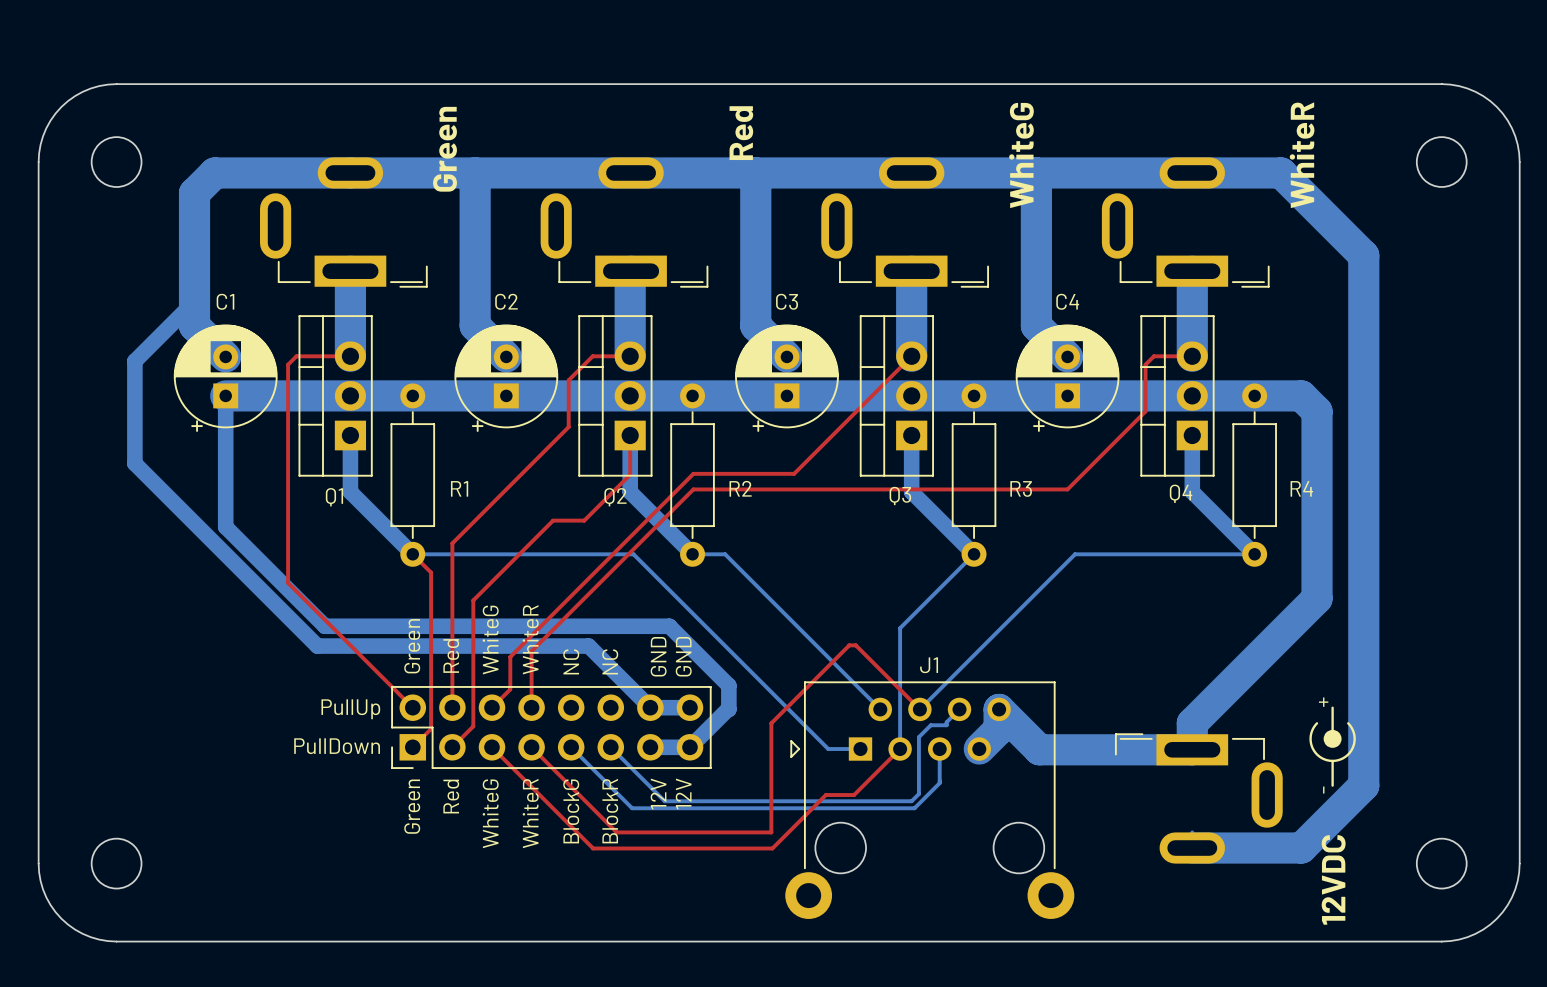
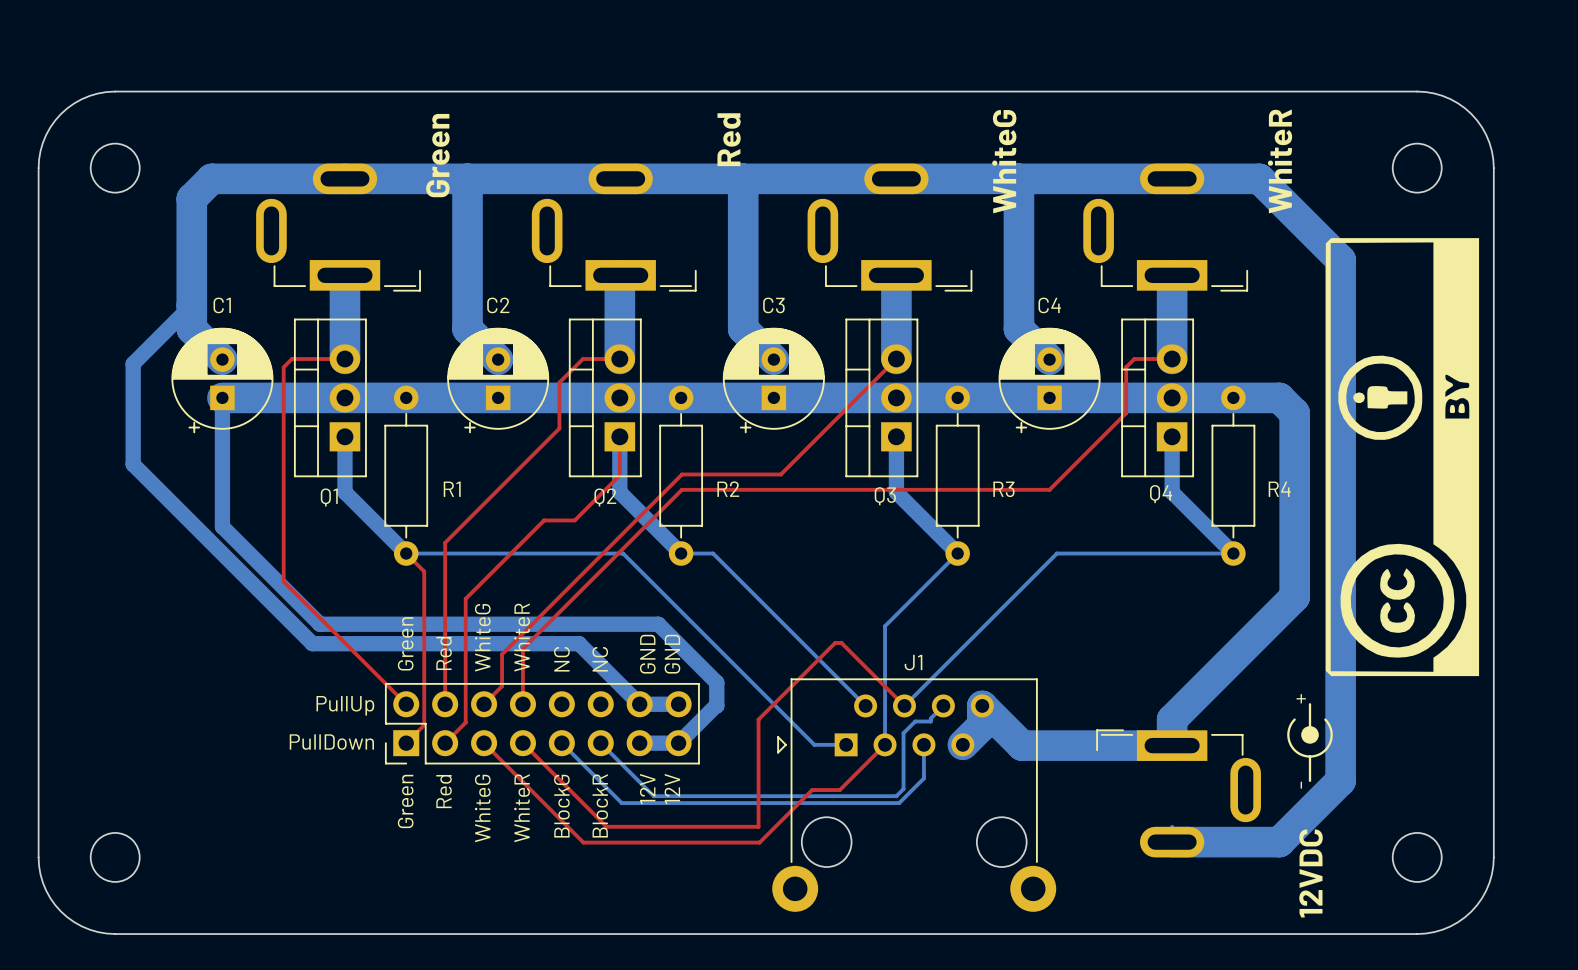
drawing: none -> [1325, 238, 1480, 677]

